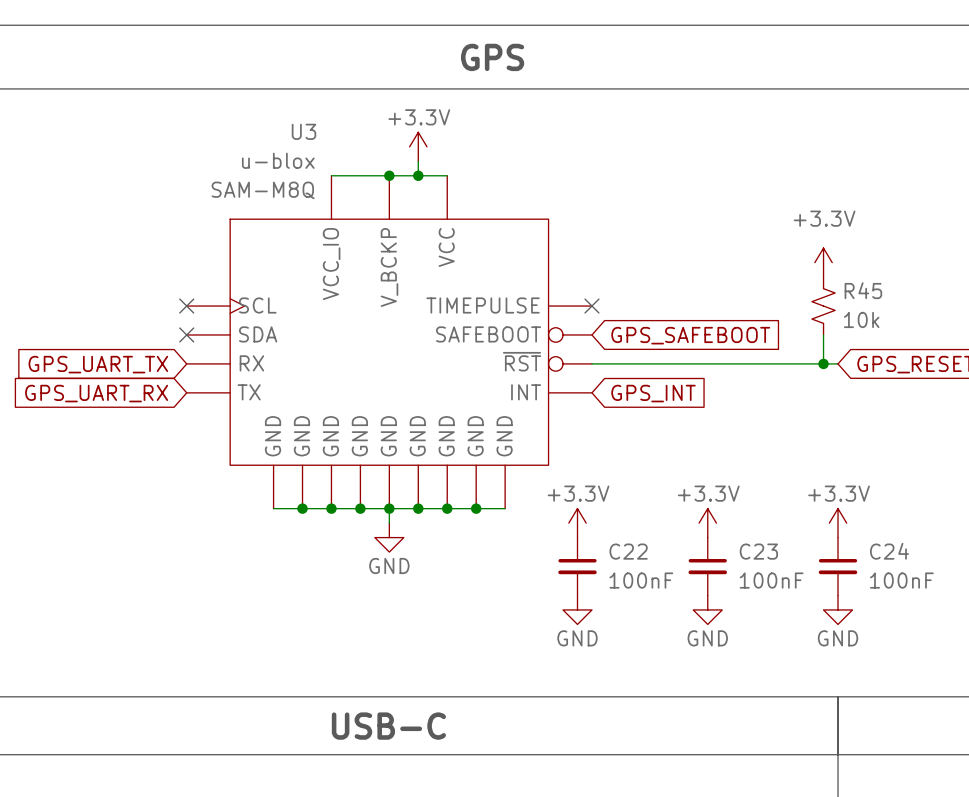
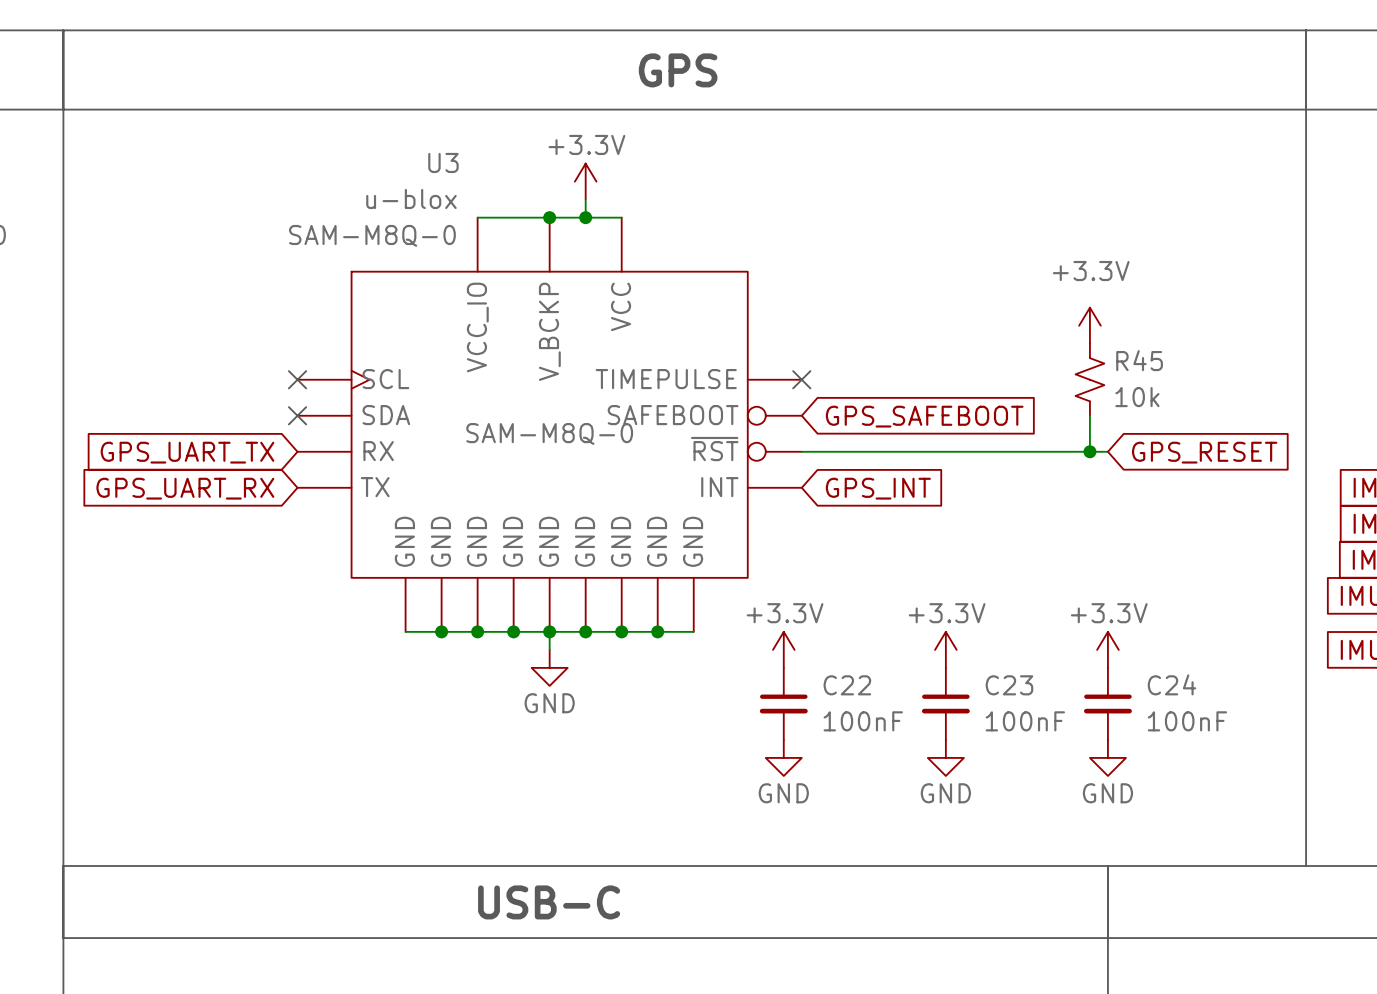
U3 text: SAM-M8Q (263, 190) -> SAM-M8Q-0 (372, 235)
U3 value: none -> SAM-M8Q-0 (549, 433)

